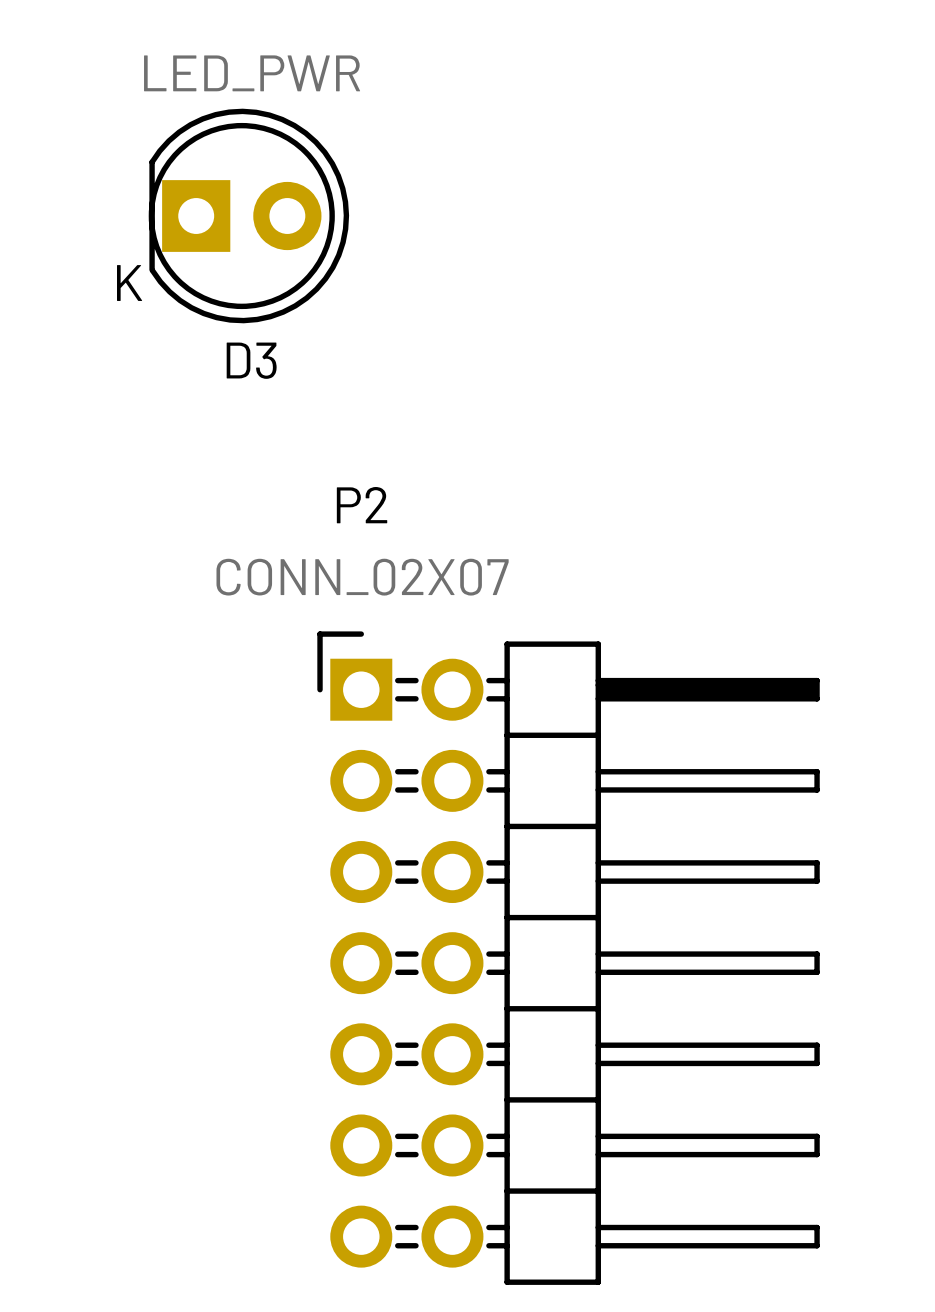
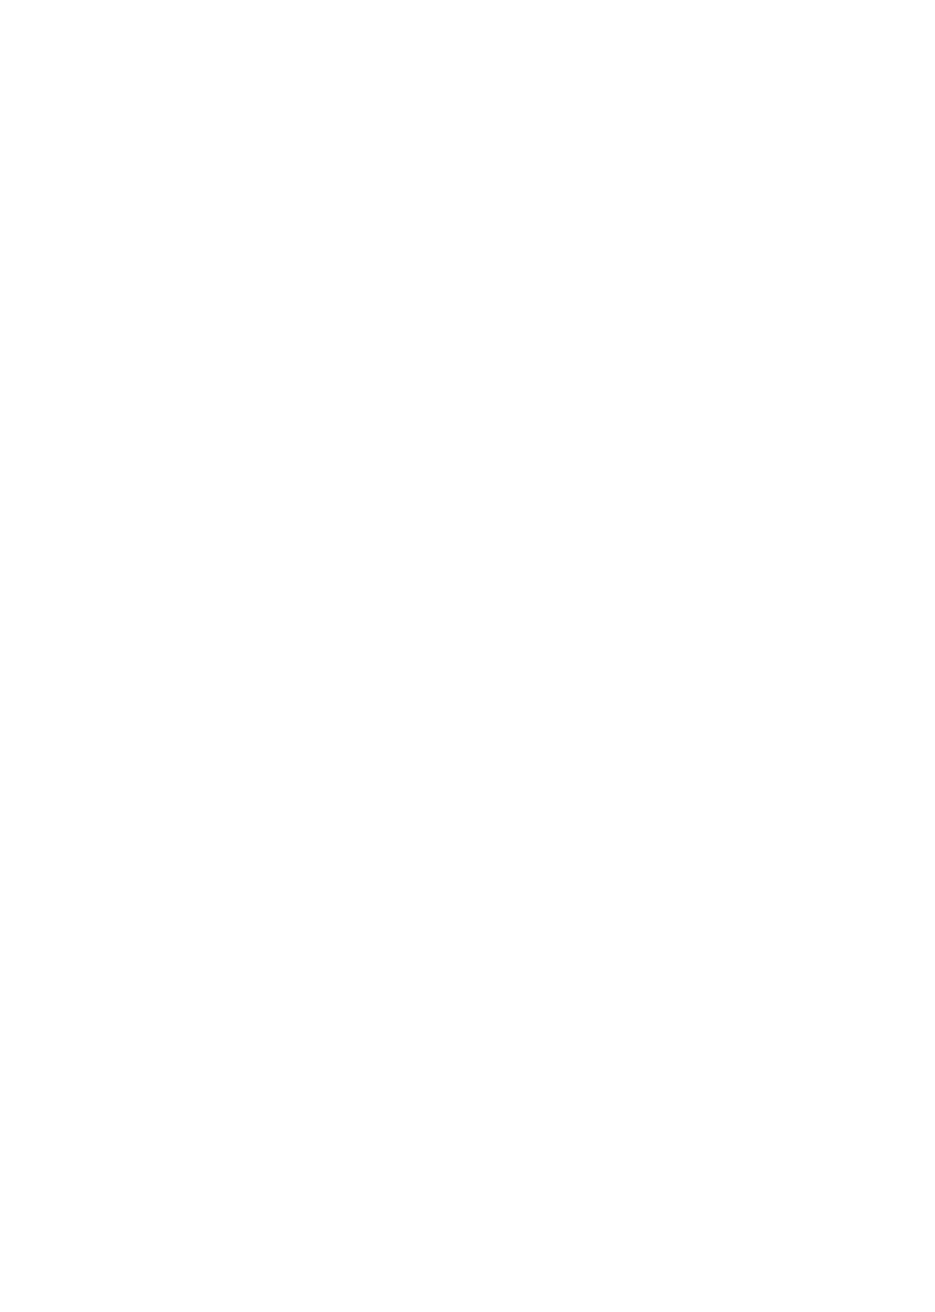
D3: LED_PWR (248, 215) -> none
P2: CONN_02X07 (568, 958) -> none

